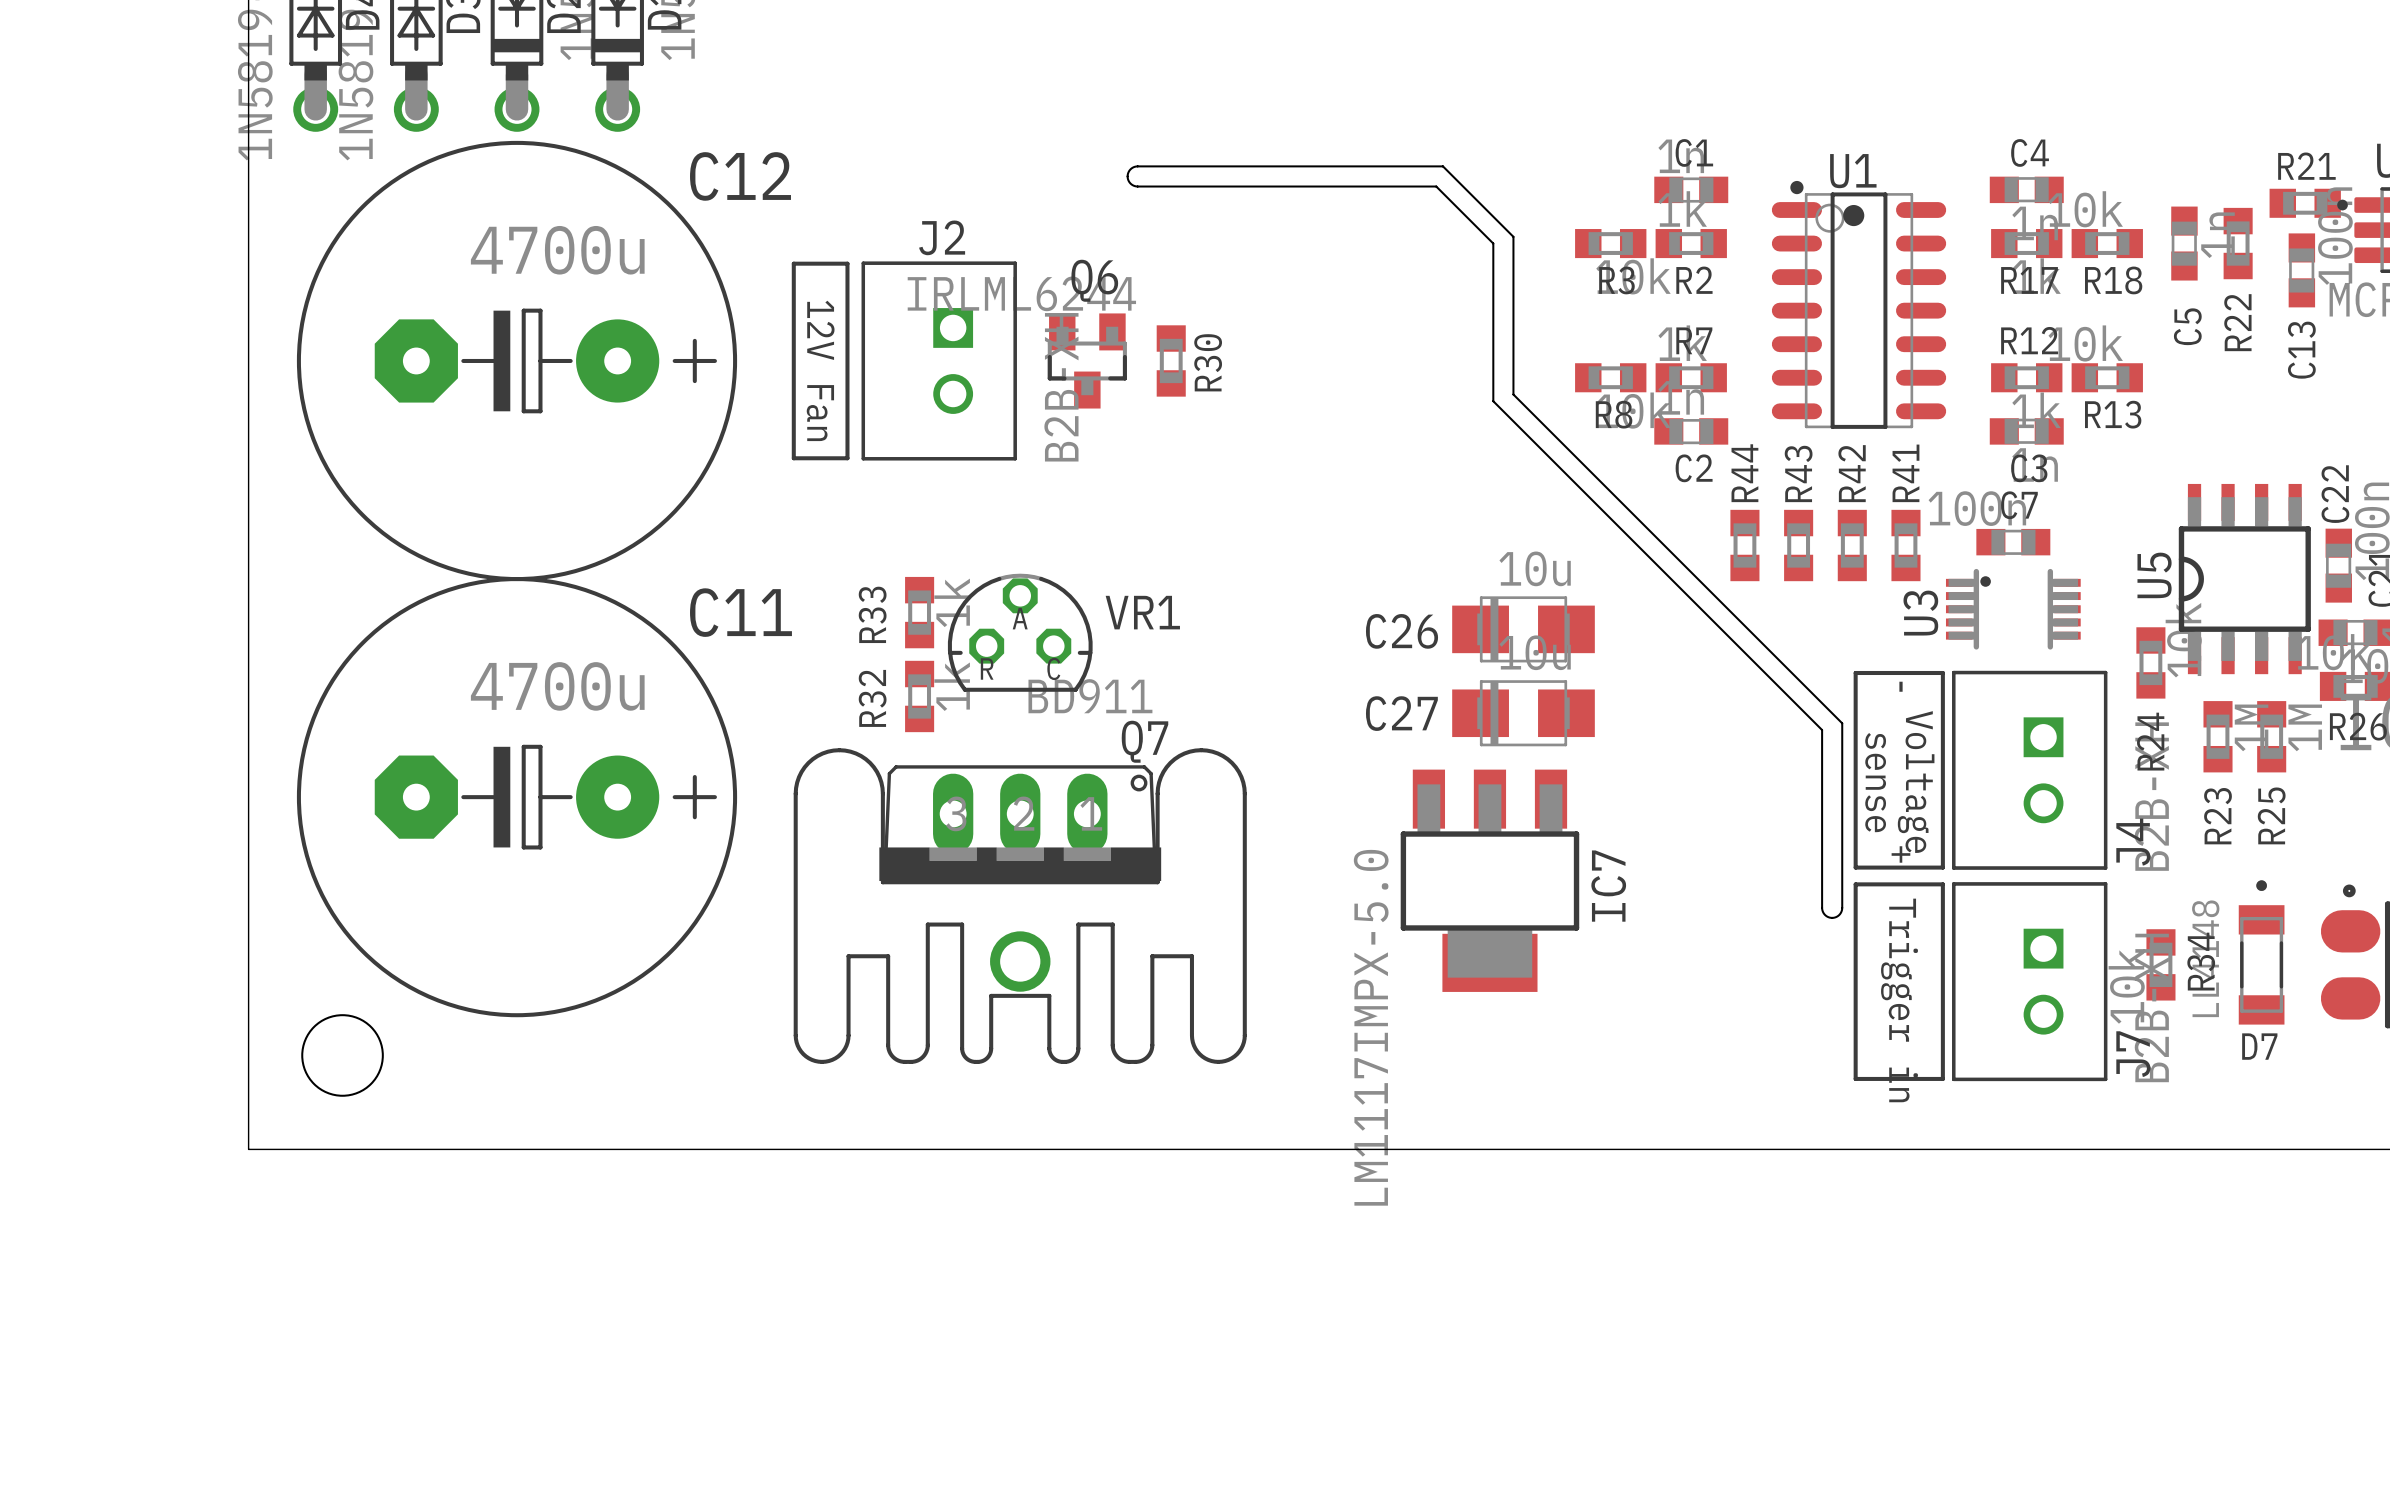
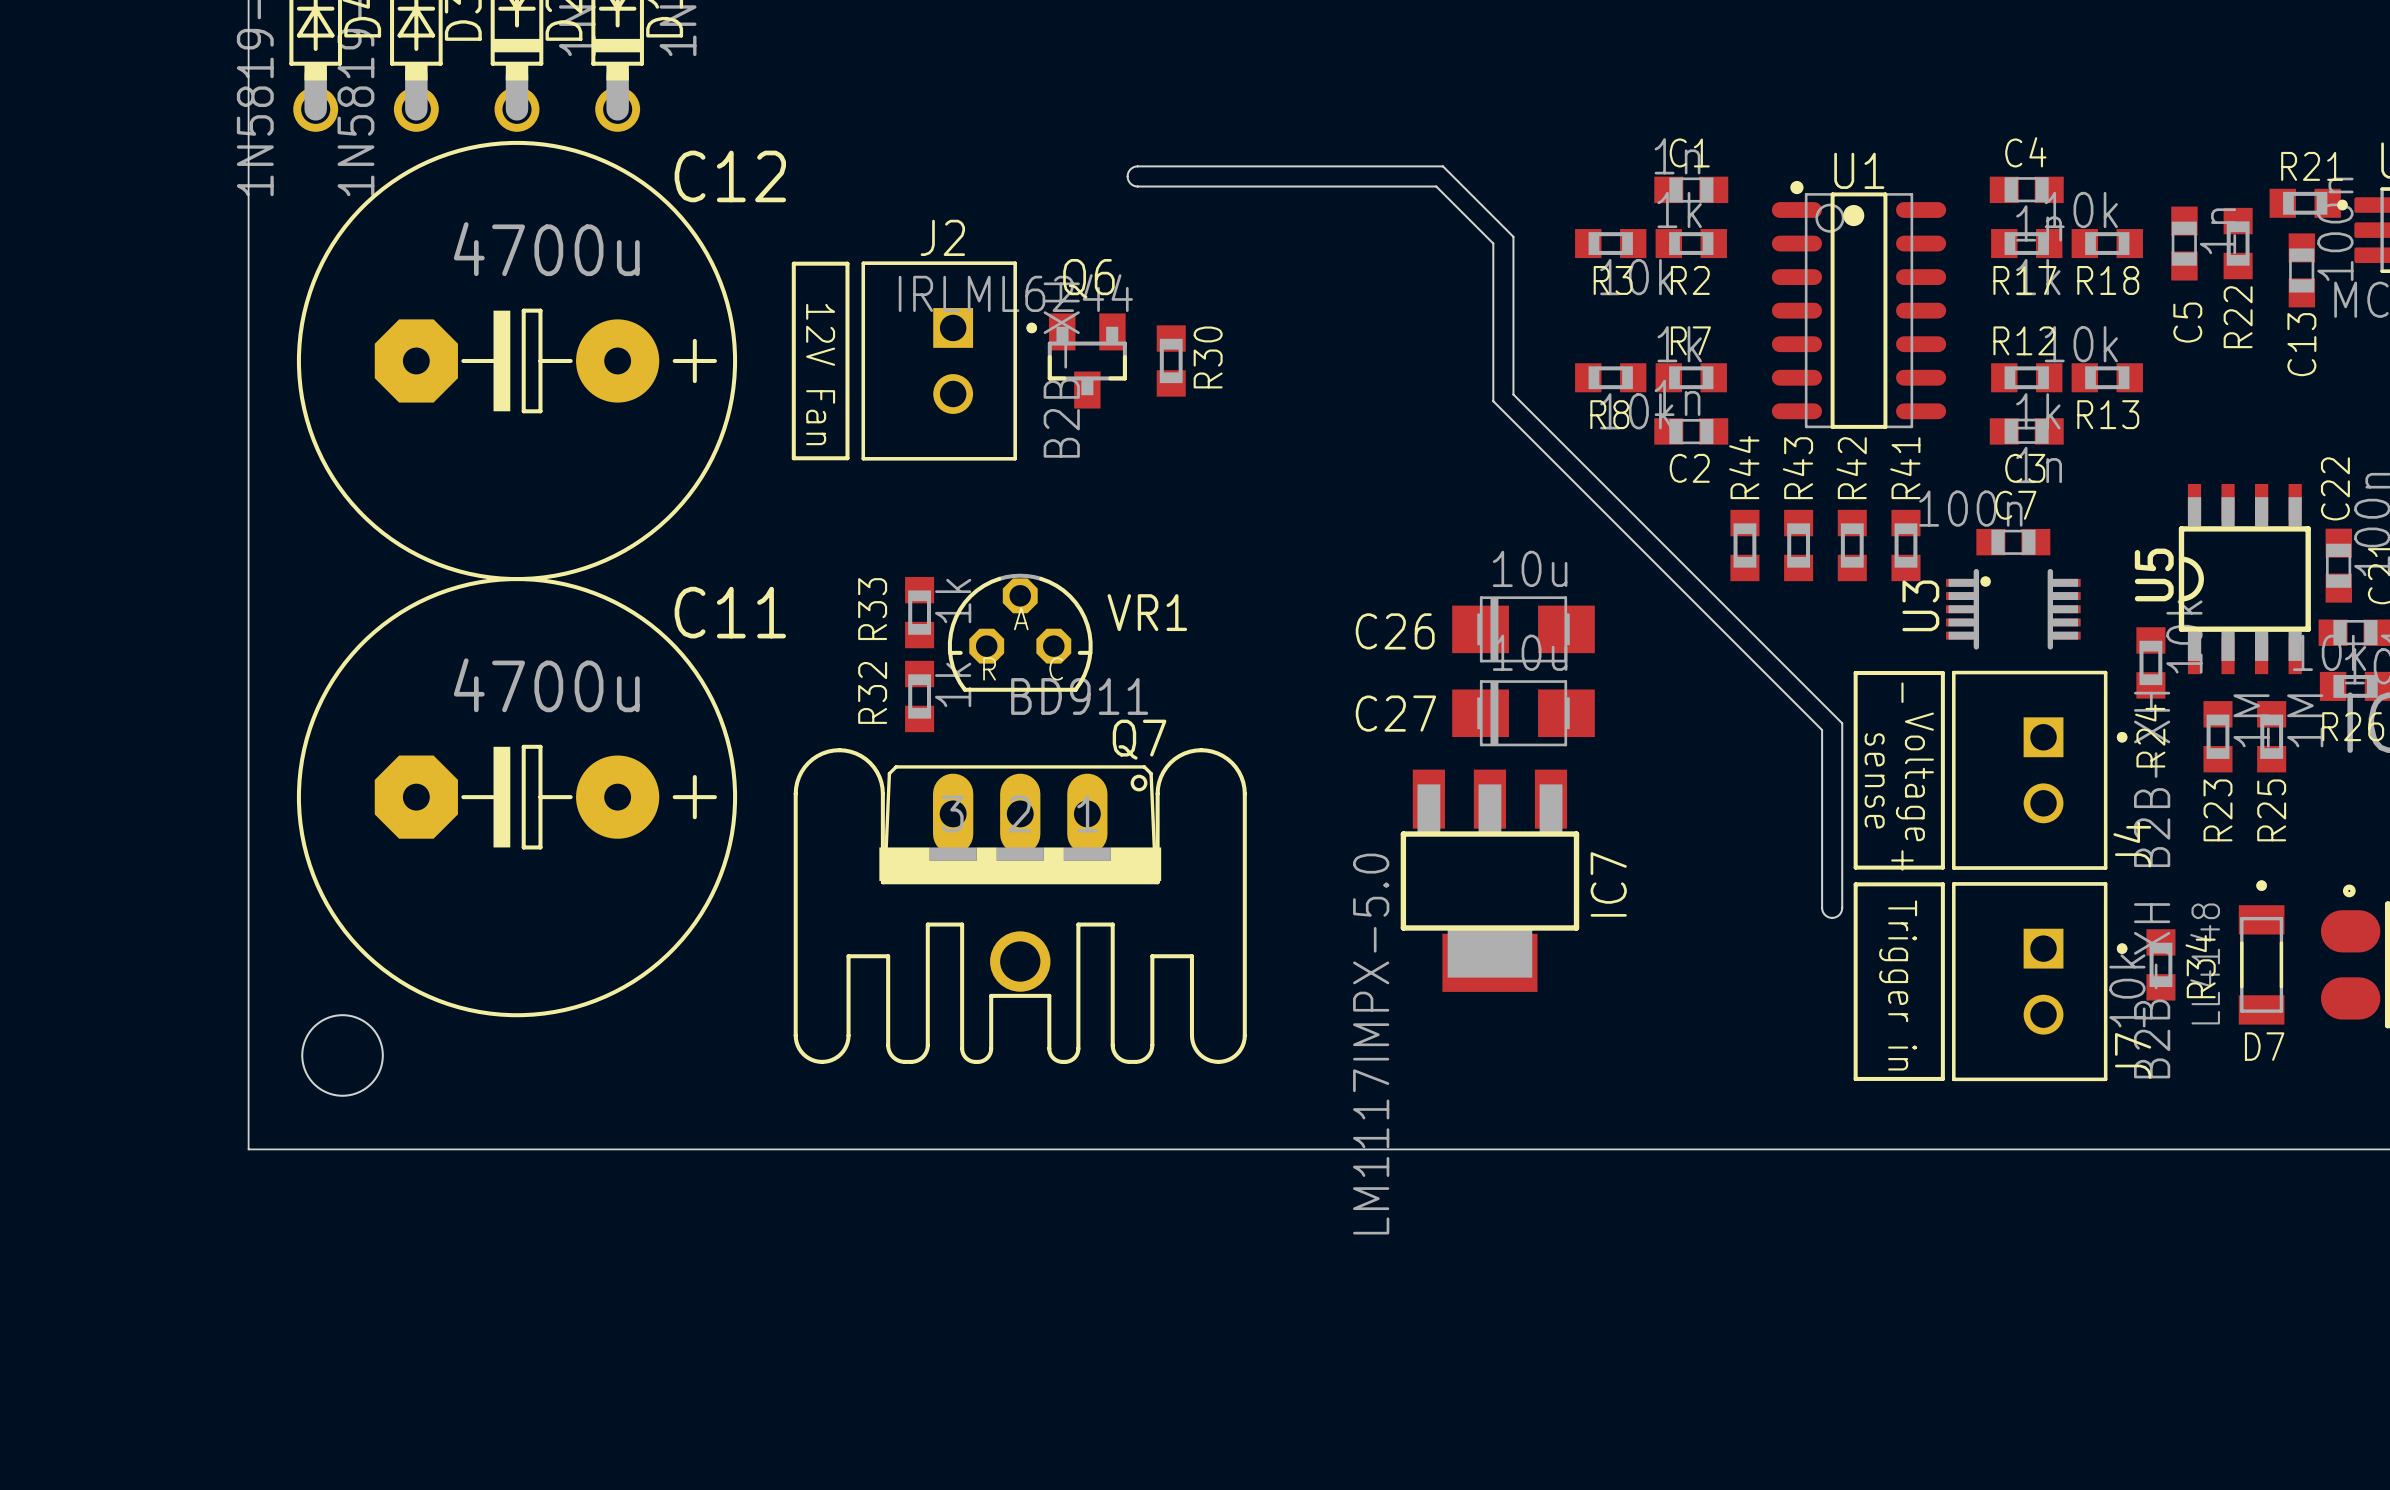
J2 footprint: [861, 261, 1017, 461] -> [861, 261, 1038, 461]
J4 footprint: [1952, 670, 2108, 870] -> [1952, 670, 2128, 870]
J7 footprint: [1952, 882, 2108, 1082] -> [1952, 882, 2128, 1082]

